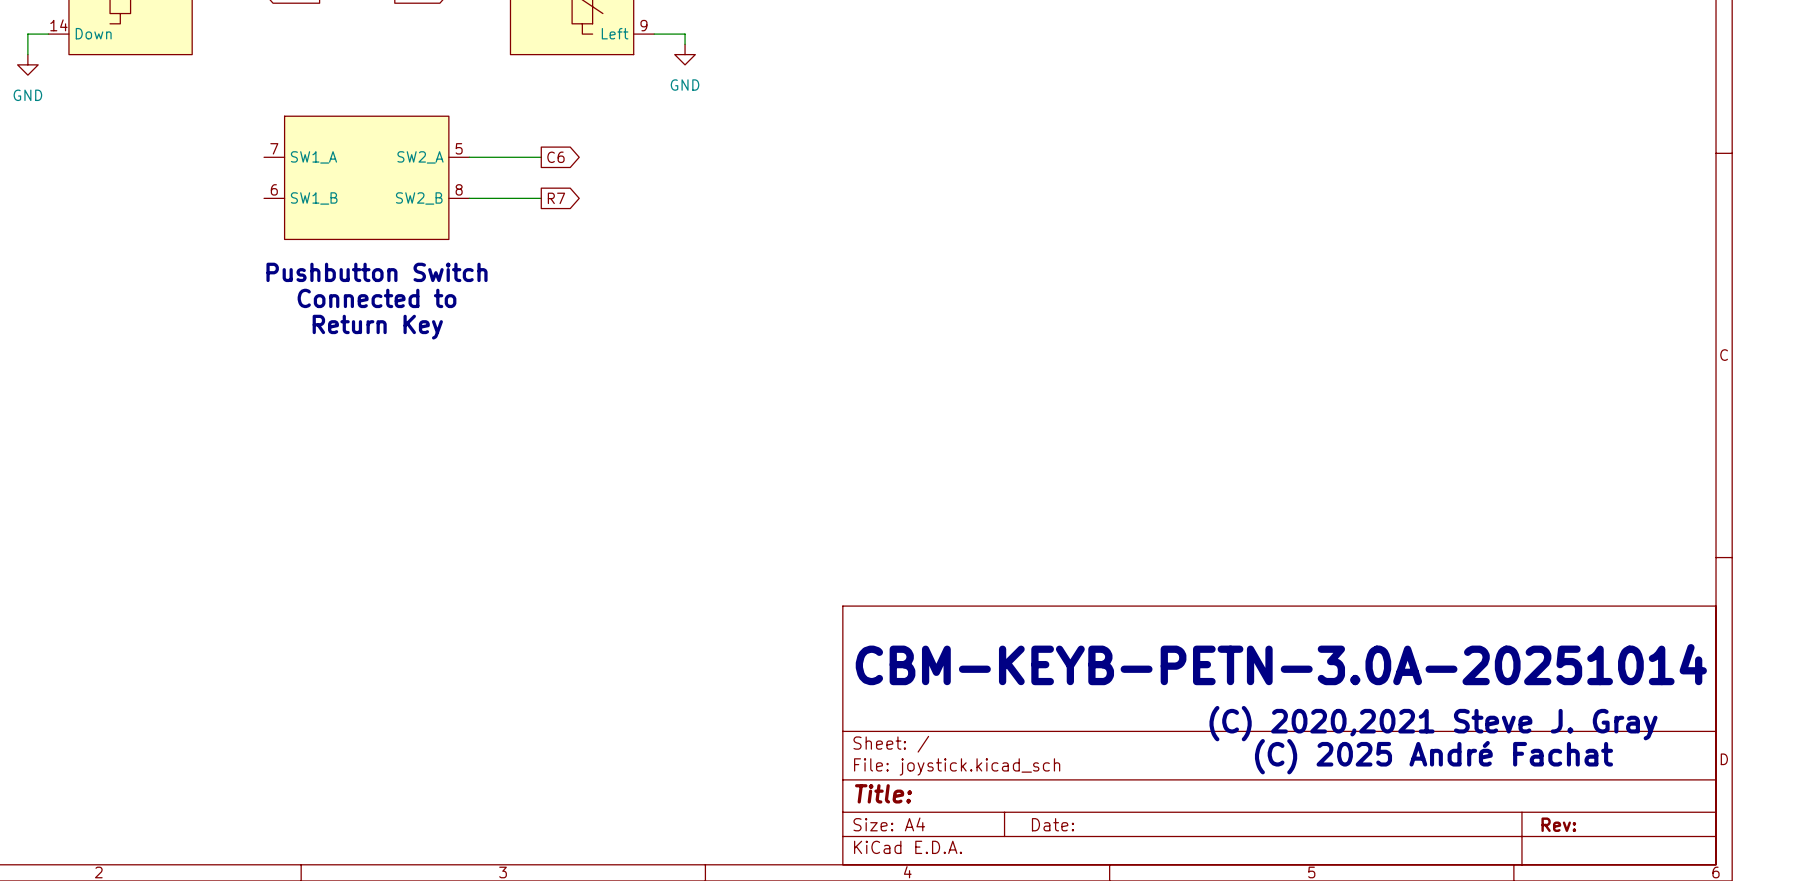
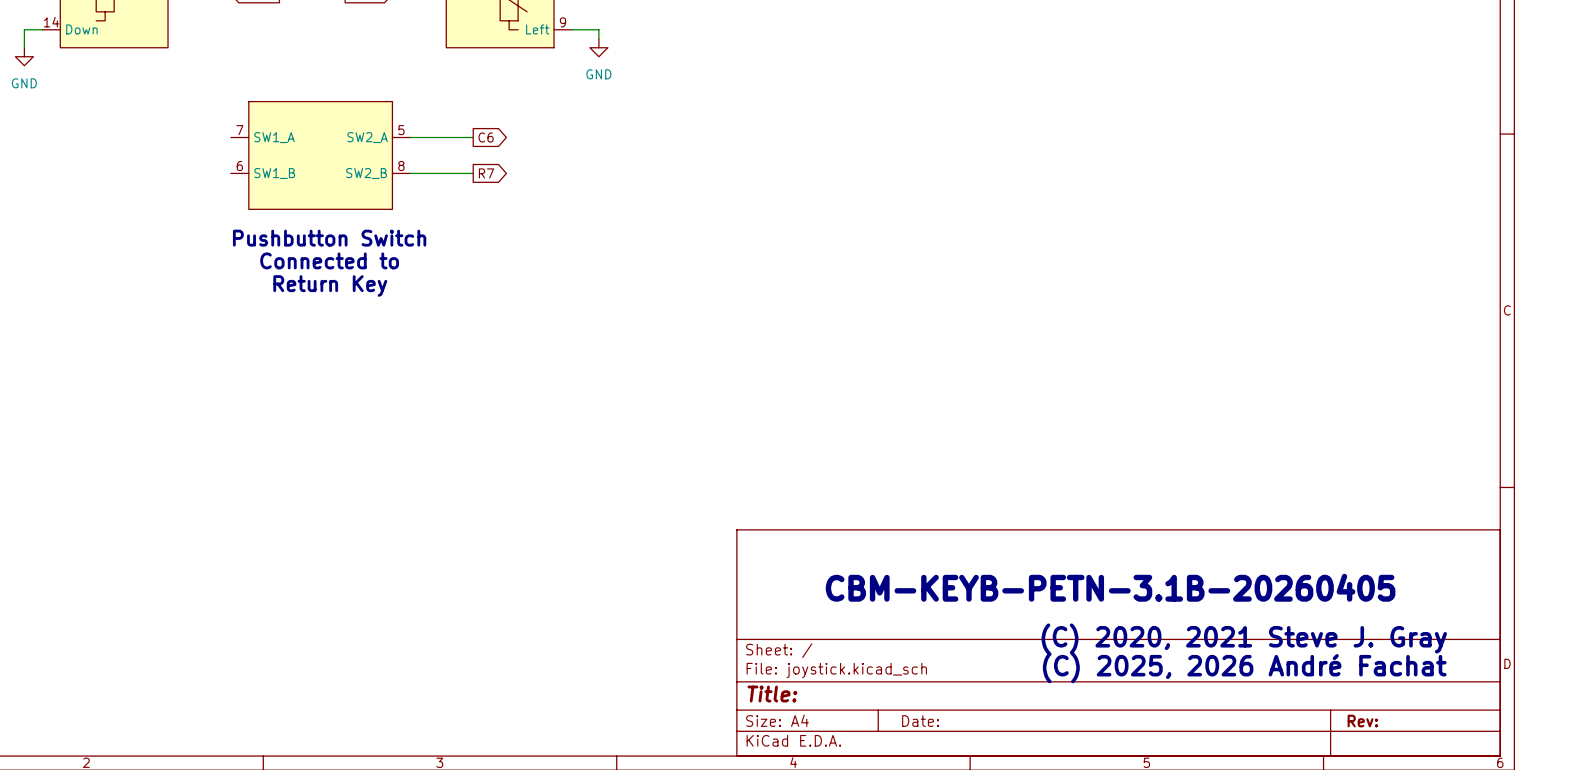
text: CBM-KEYB-PETN-3.0A-20251014 (1281, 664) -> CBM-KEYB-PETN-3.1B-20260405 (1110, 587)
text: (C) 2020,2021 Steve J. Gray (1433, 723) -> (C) 2020, 2021 Steve J. Gray (1244, 638)
text: (C) 2025 André Fachat (1433, 756) -> (C) 2025, 2026 André Fachat (1244, 667)

